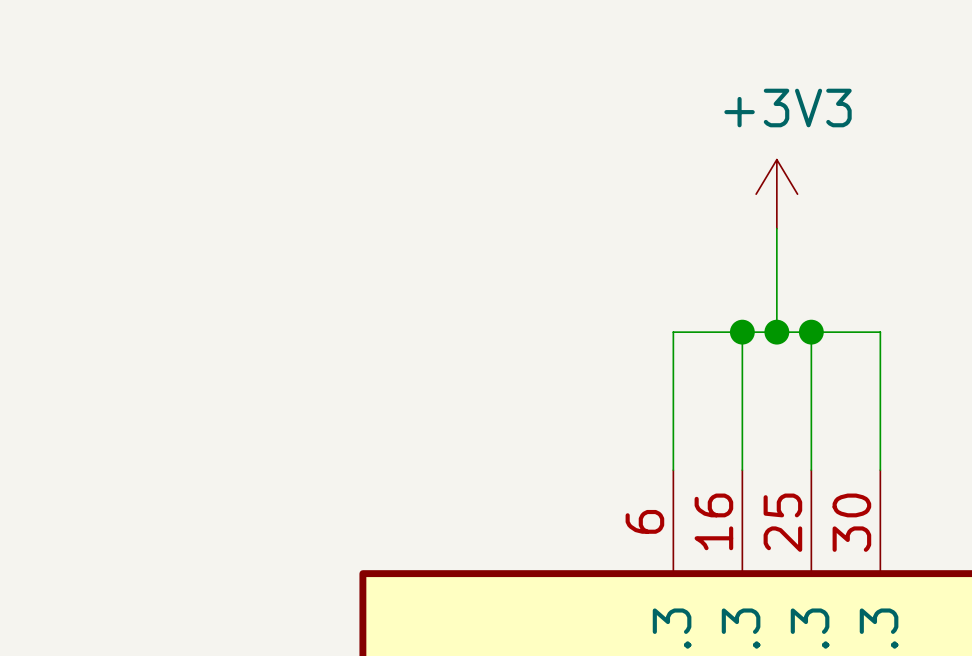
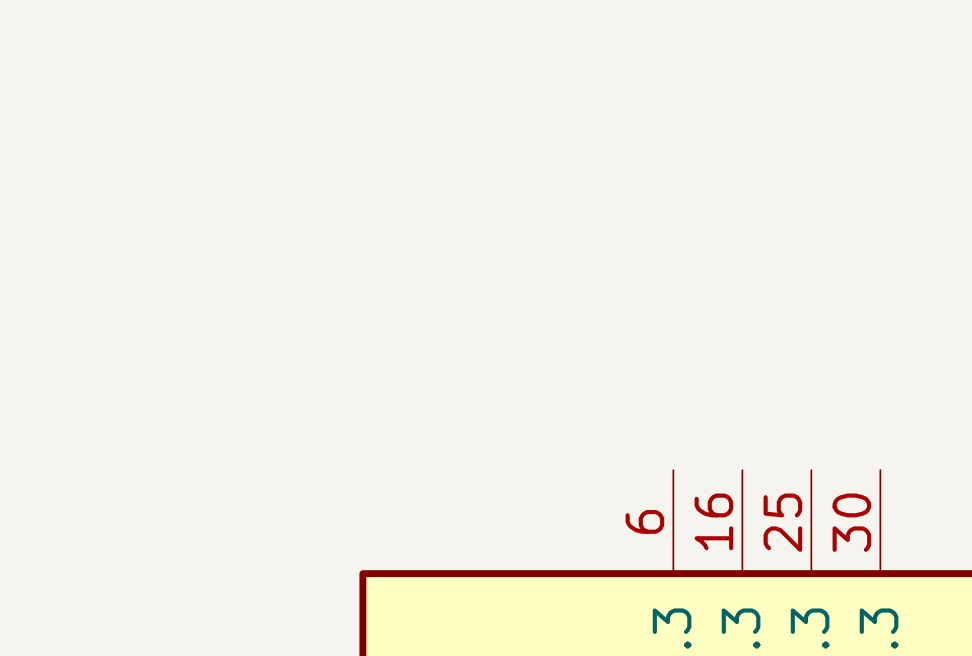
power symbol: +3V3 (776, 194) -> none
wire: (776, 228) (776, 332) -> none
wire: (742, 332) (742, 470) -> none
junction: (742, 332) -> none
junction: (776, 332) -> none
wire: (811, 332) (811, 470) -> none
junction: (811, 332) -> none
wire: (673, 470) (673, 332) (880, 332) (880, 470) -> none

